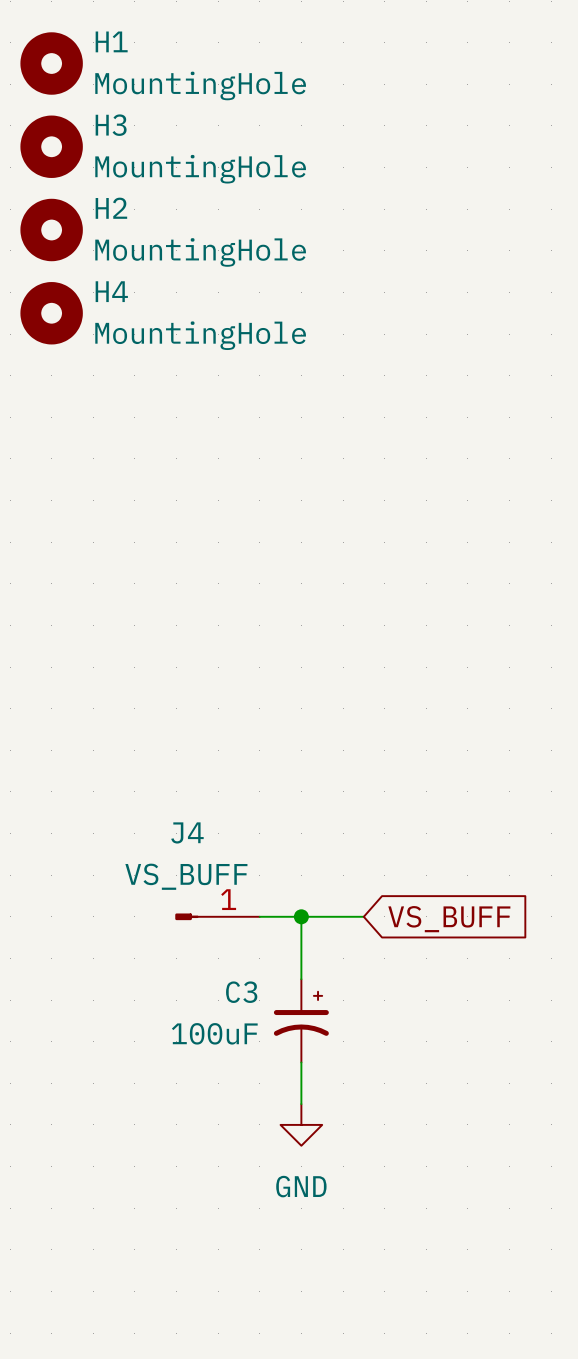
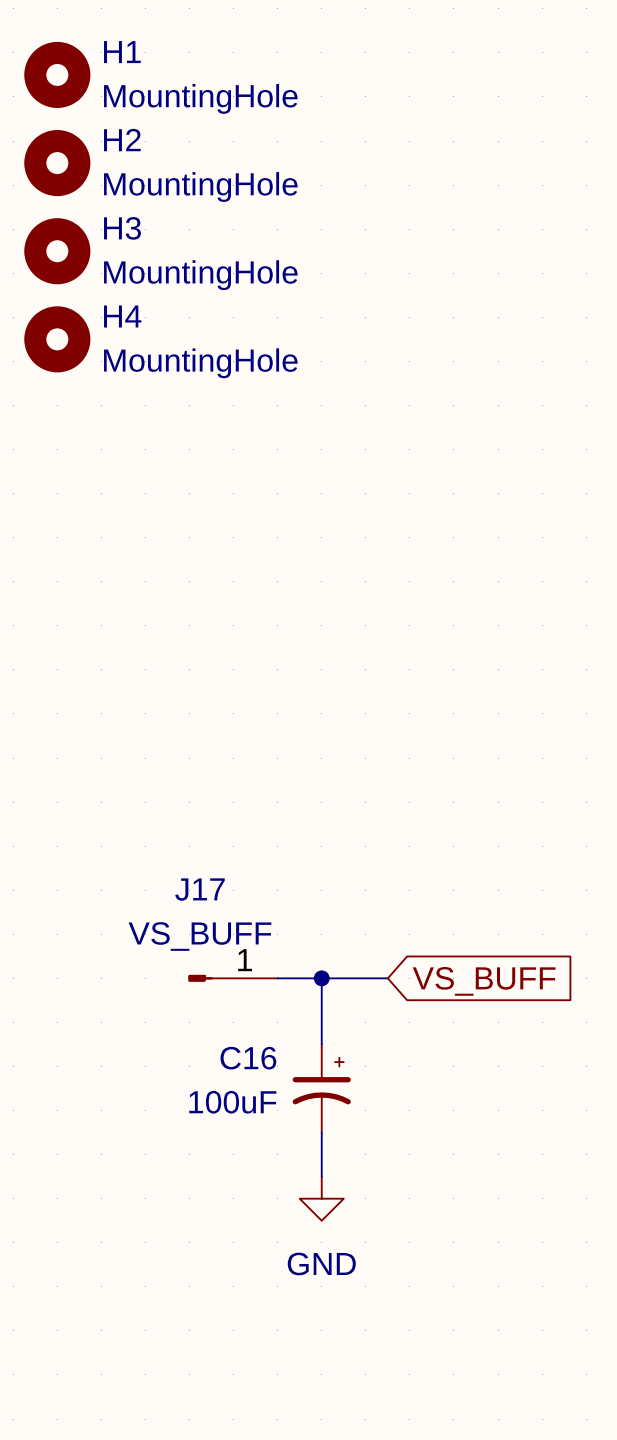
H3 name: H3 (111, 125) -> H2 (122, 140)
H2 name: H2 (111, 208) -> H3 (122, 228)
J4 name: J4 (187, 832) -> J17 (200, 889)
C3 name: C3 (241, 992) -> C16 (248, 1058)

